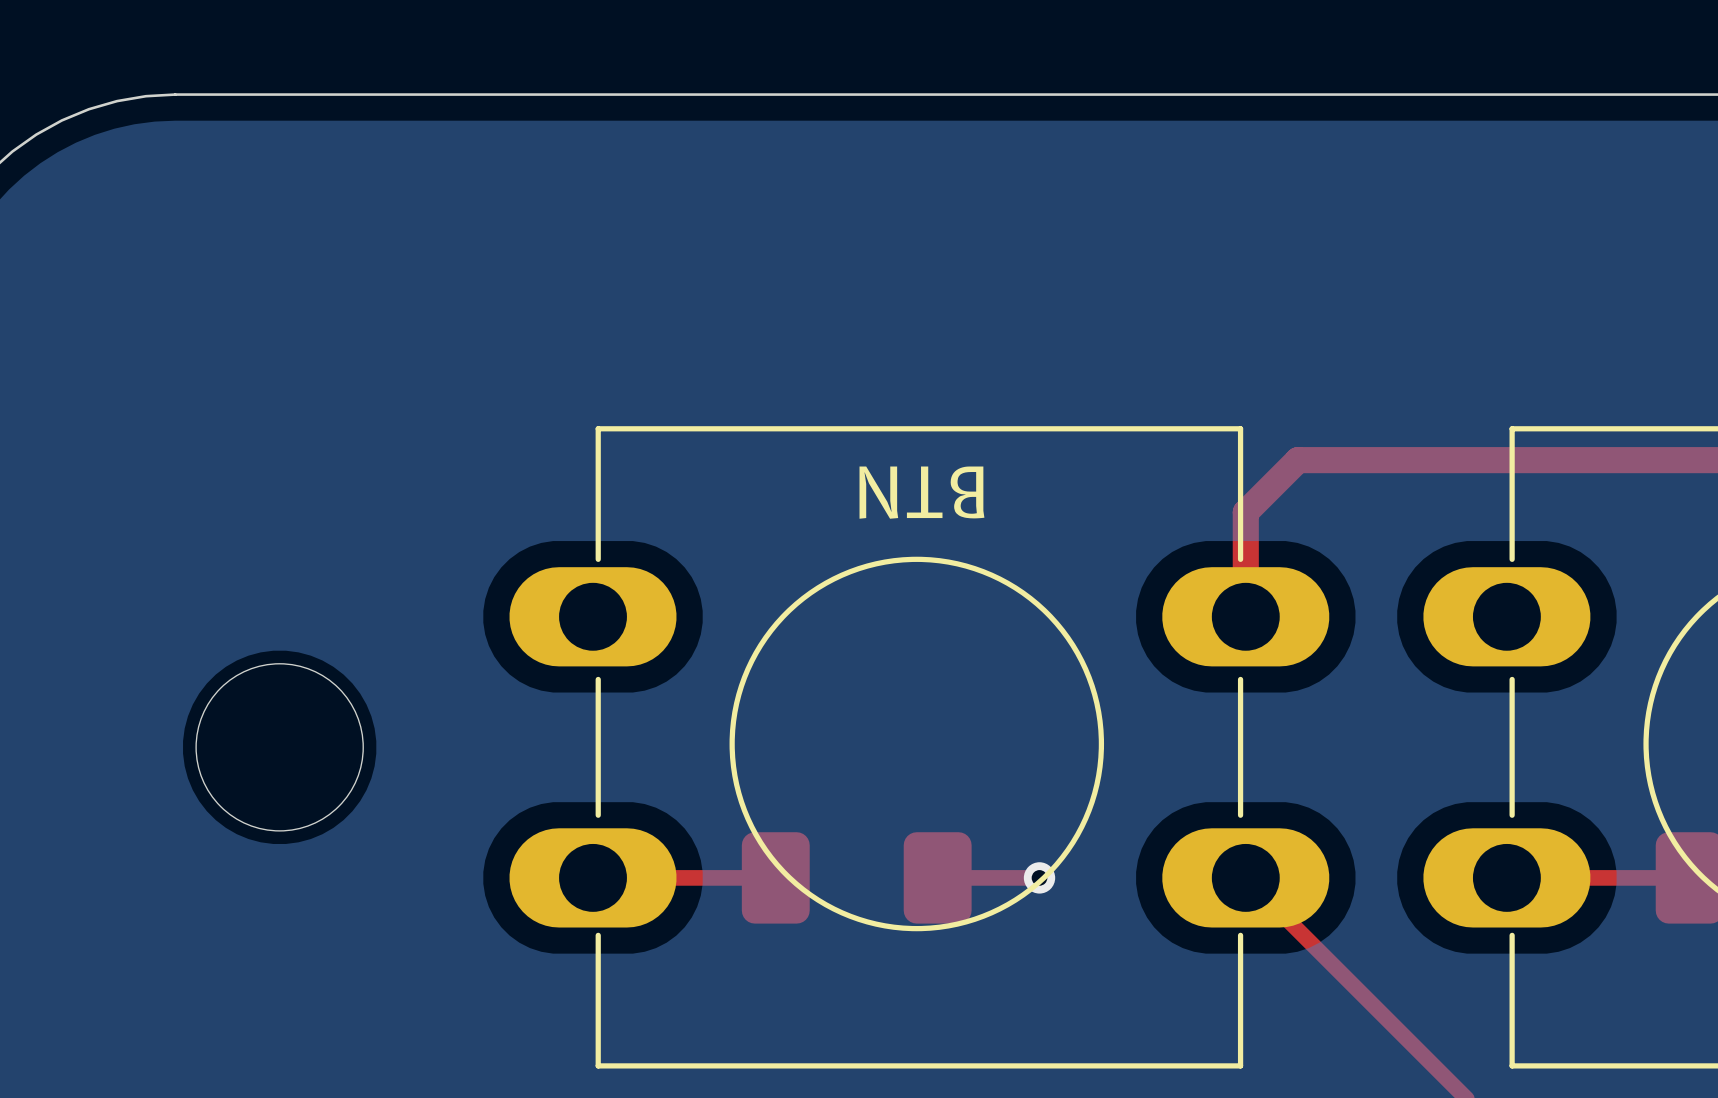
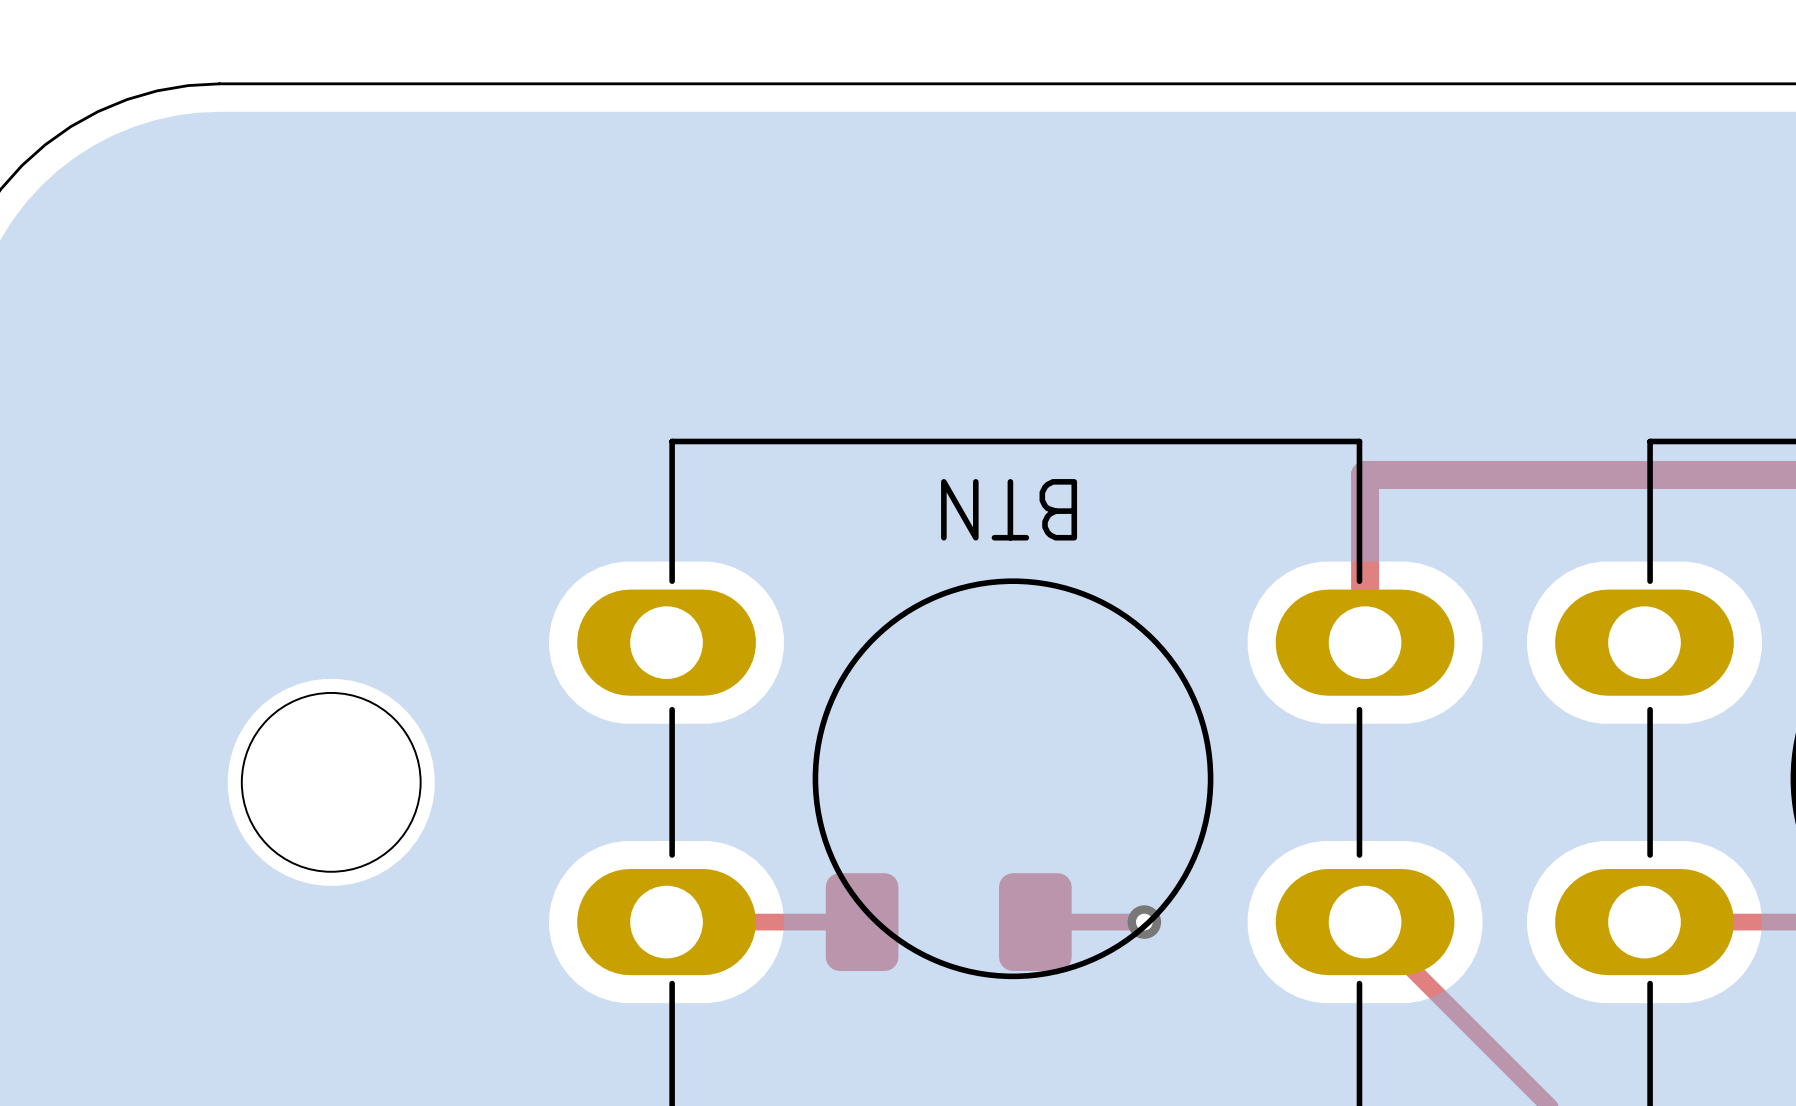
top track: (1298, 460) (1245, 512) -> (1420, 475) (1365, 475) (1365, 530)

